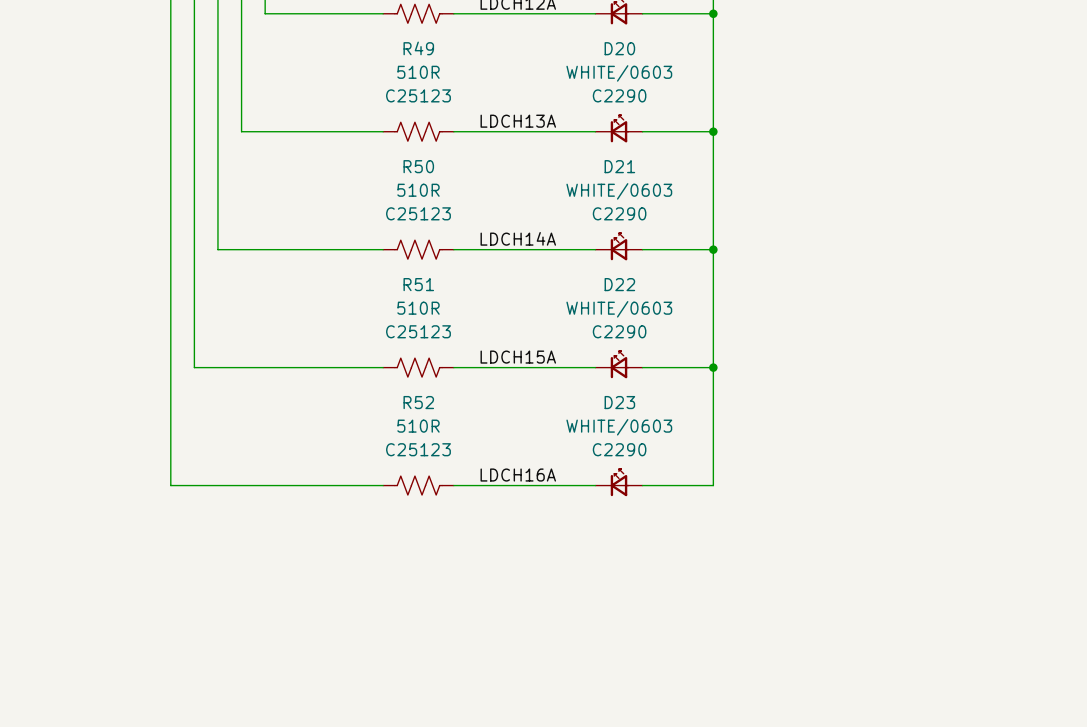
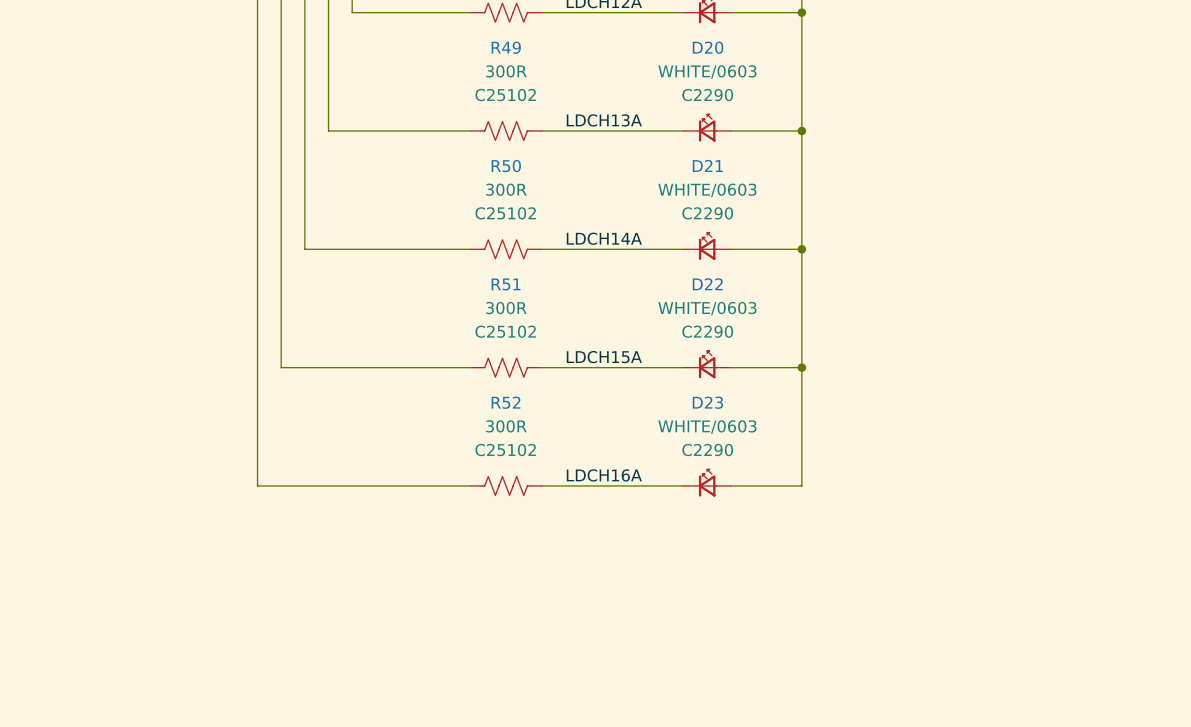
R49 value: 510R (418, 72) -> 300R (506, 71)
R49 text: C25123 (418, 95) -> C25102 (505, 95)
R50 value: 510R (418, 190) -> 300R (506, 189)
R50 text: C25123 (418, 213) -> C25102 (505, 213)
R51 value: 510R (418, 308) -> 300R (506, 308)
R51 text: C25123 (418, 331) -> C25102 (505, 331)
R52 value: 510R (418, 426) -> 300R (506, 426)
R52 text: C25123 (418, 449) -> C25102 (505, 450)

